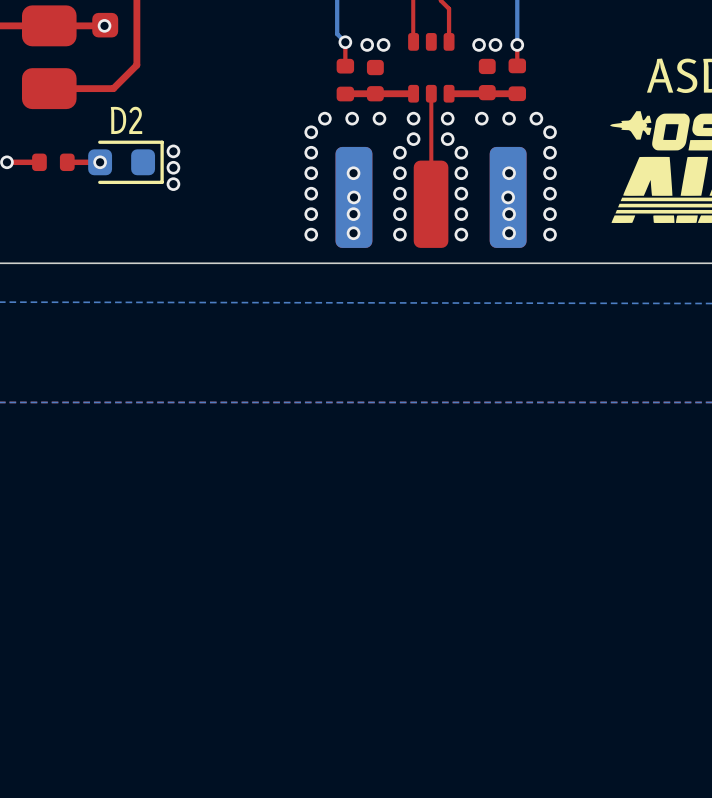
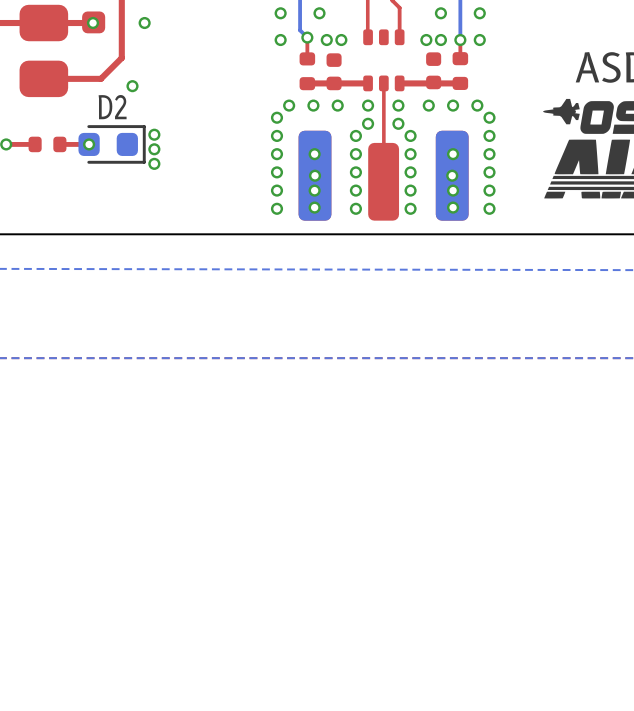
via: none -> (280, 13)
via: none -> (319, 13)
via: none -> (440, 13)
via: none -> (479, 13)
via: none -> (144, 23)
via: none -> (280, 40)
via: none -> (479, 40)
via: none -> (132, 86)

